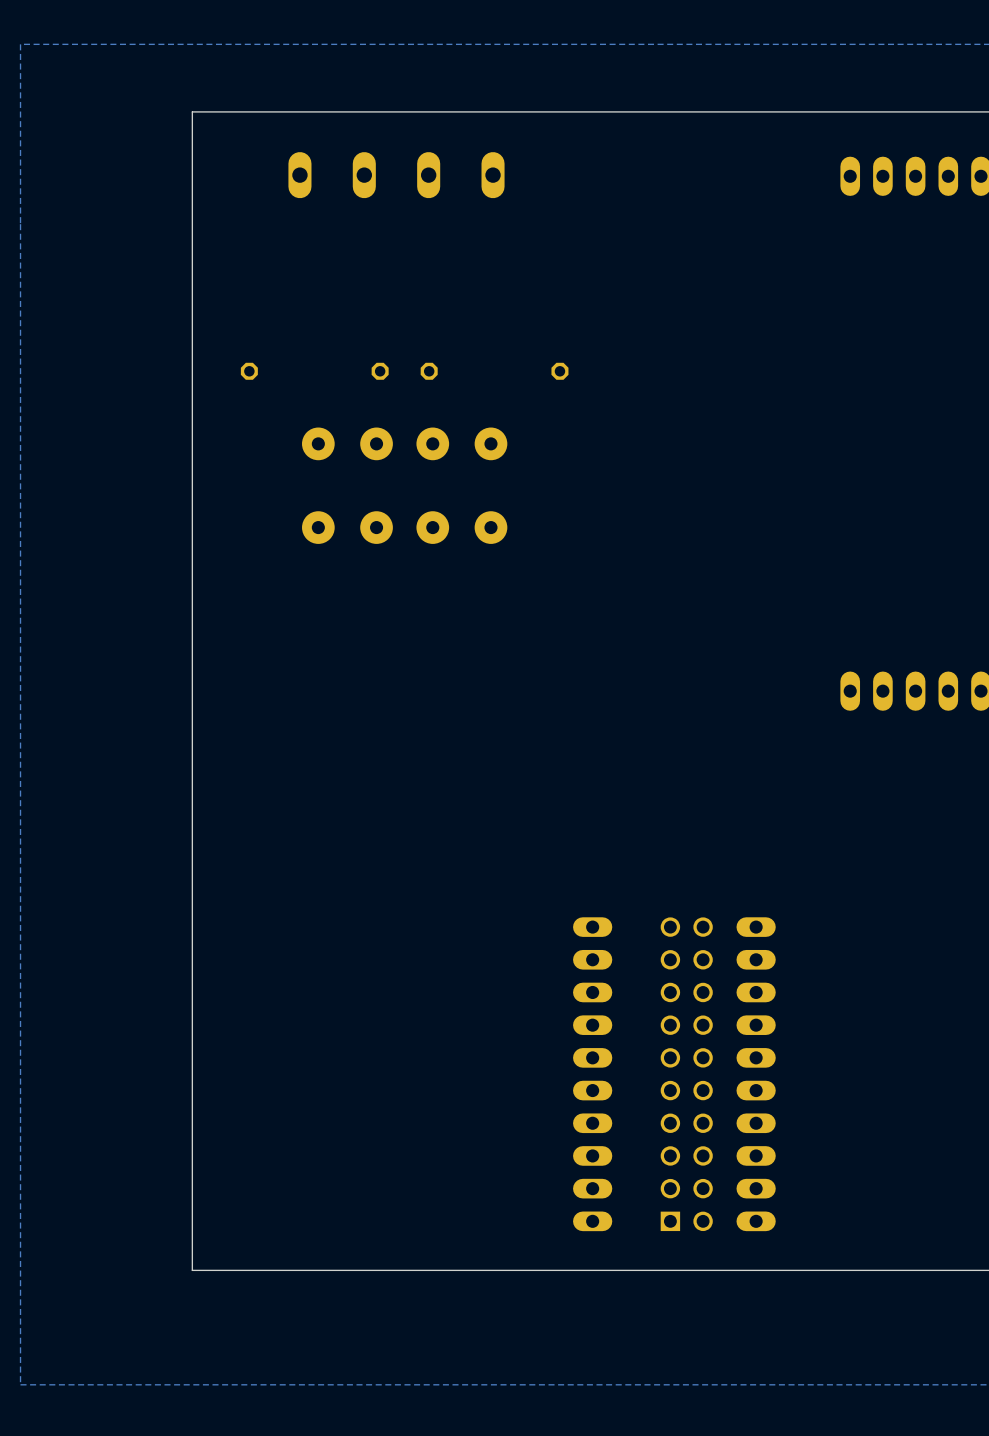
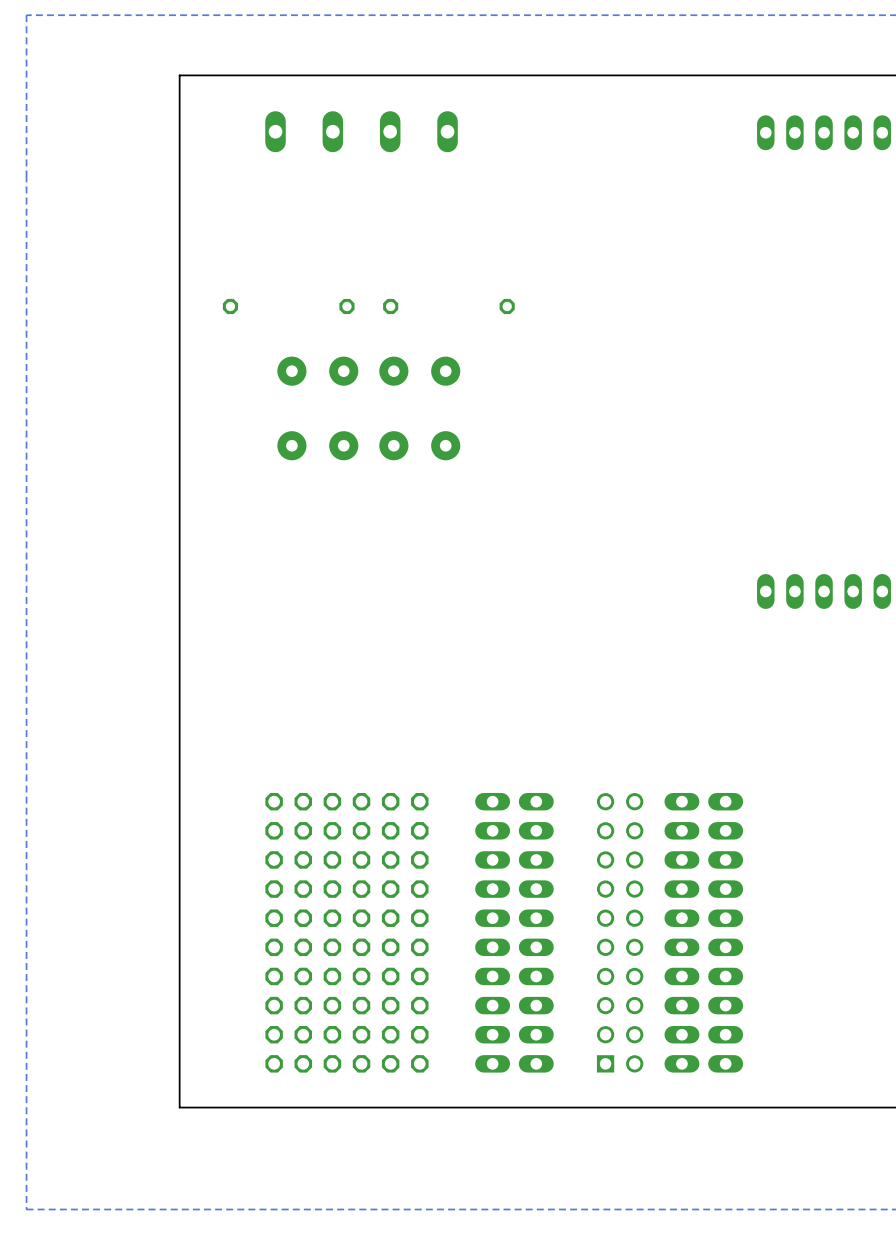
part: none -> (288, 932)
part: none -> (346, 932)
part: none -> (405, 932)
part: none -> (492, 932)
part: none -> (725, 932)

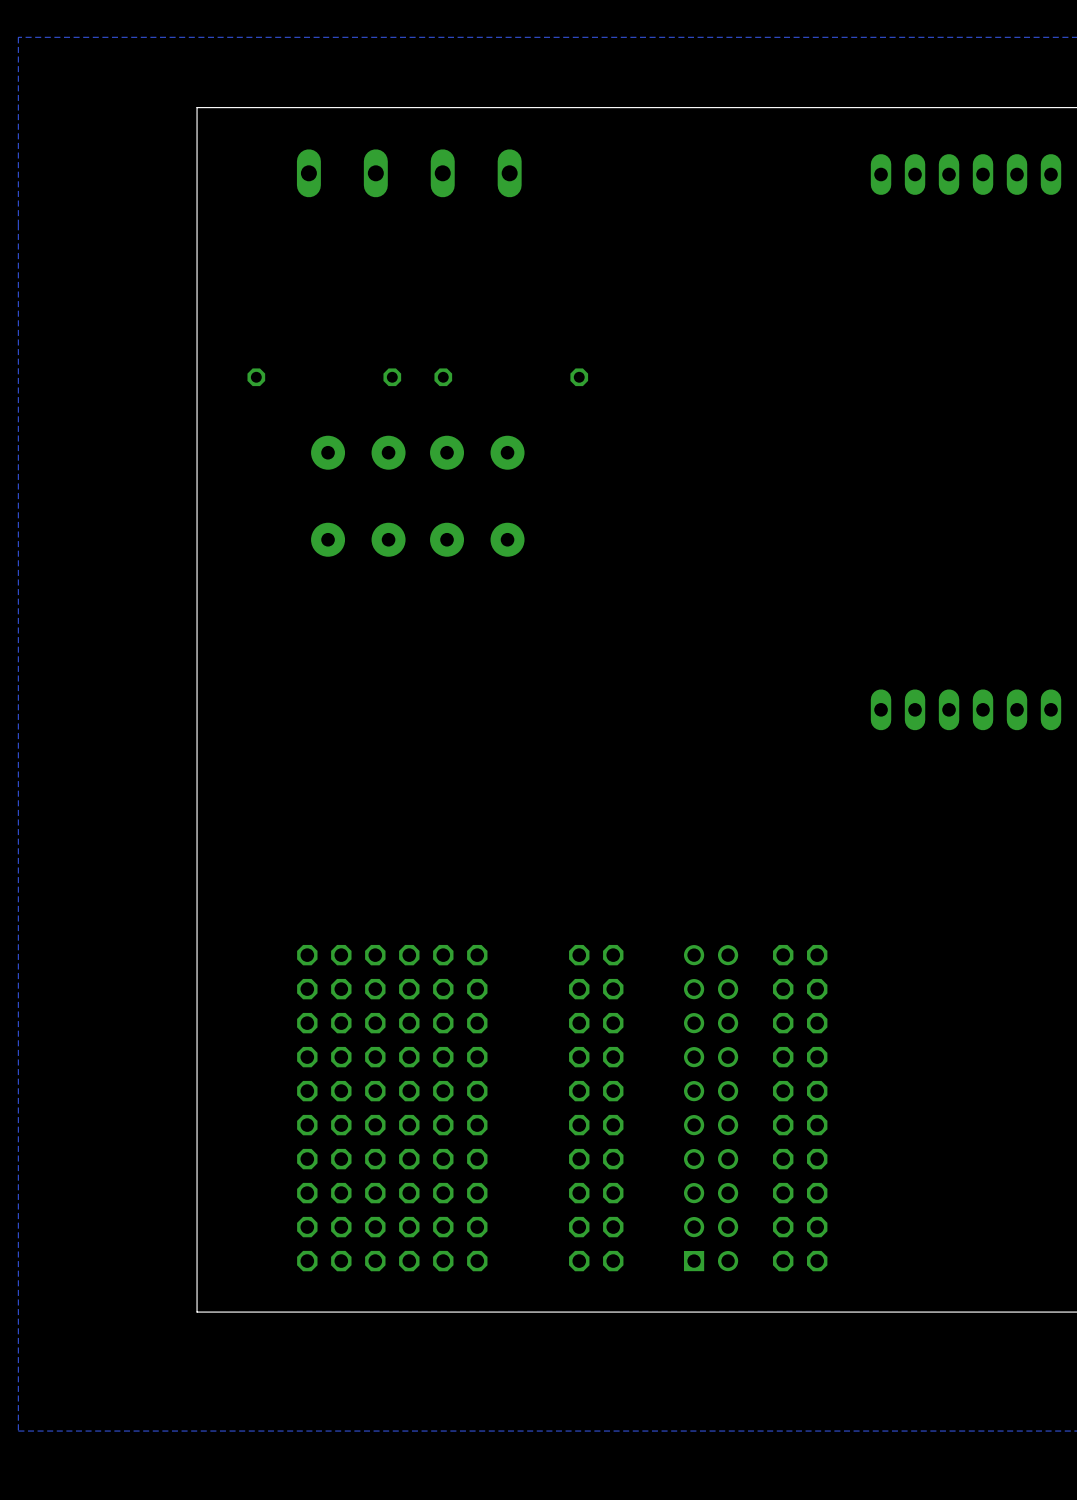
part: (492, 932) -> none
part: none -> (596, 1108)
part: (536, 932) -> none
part: (681, 932) -> none
part: none -> (800, 1108)
part: (725, 932) -> none

